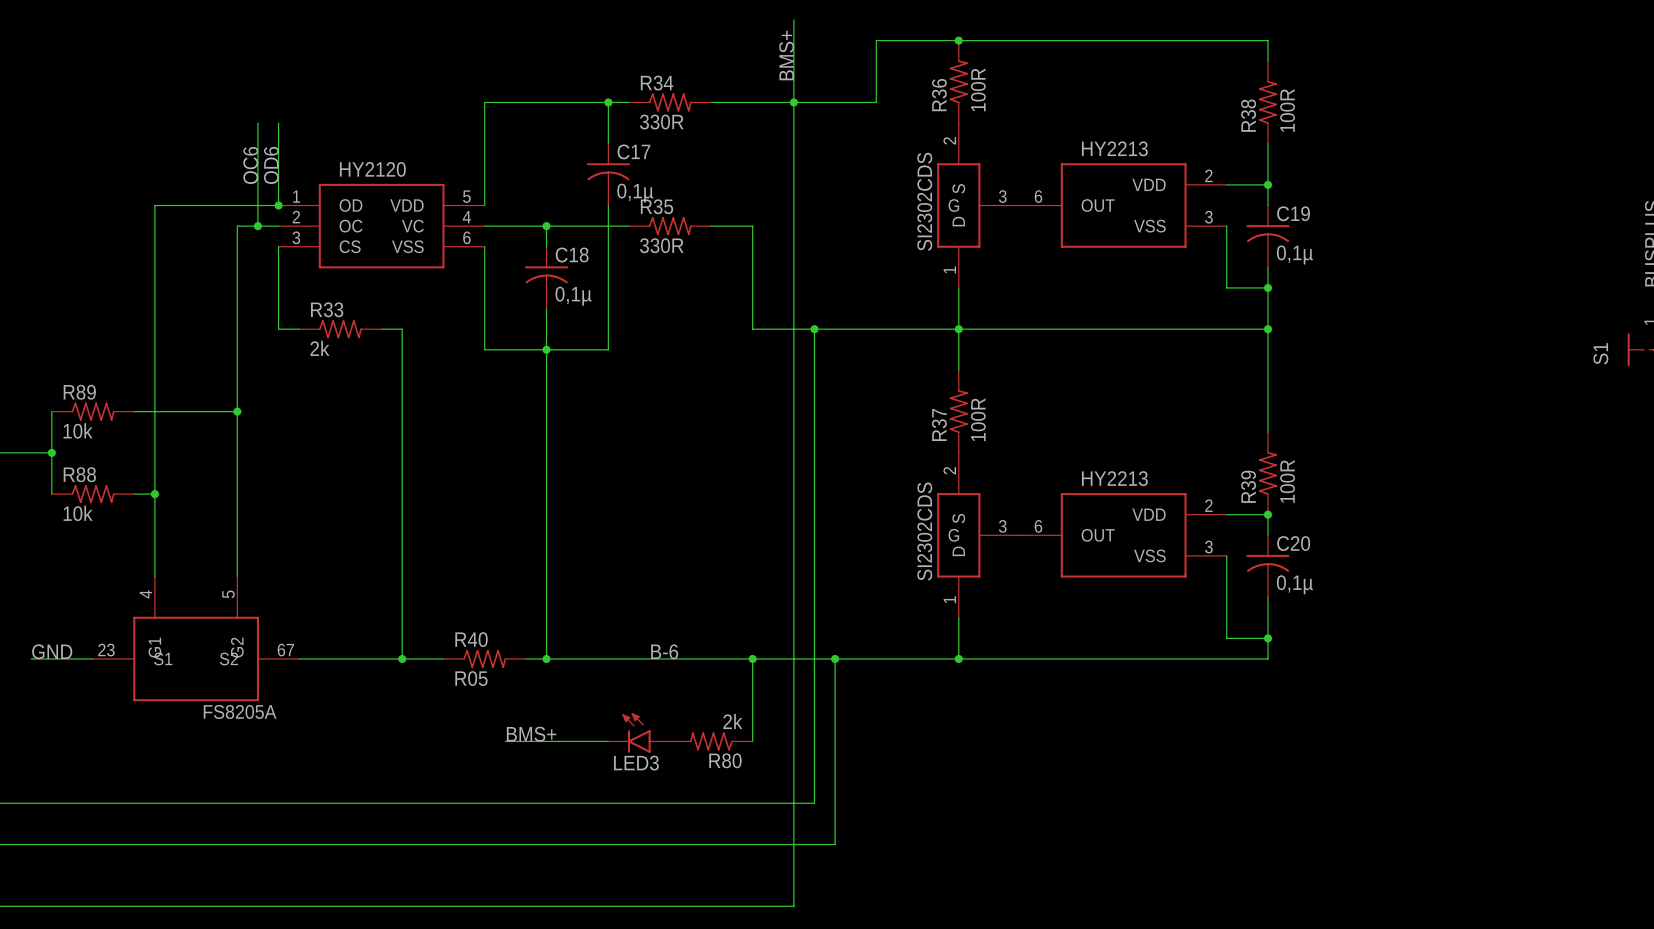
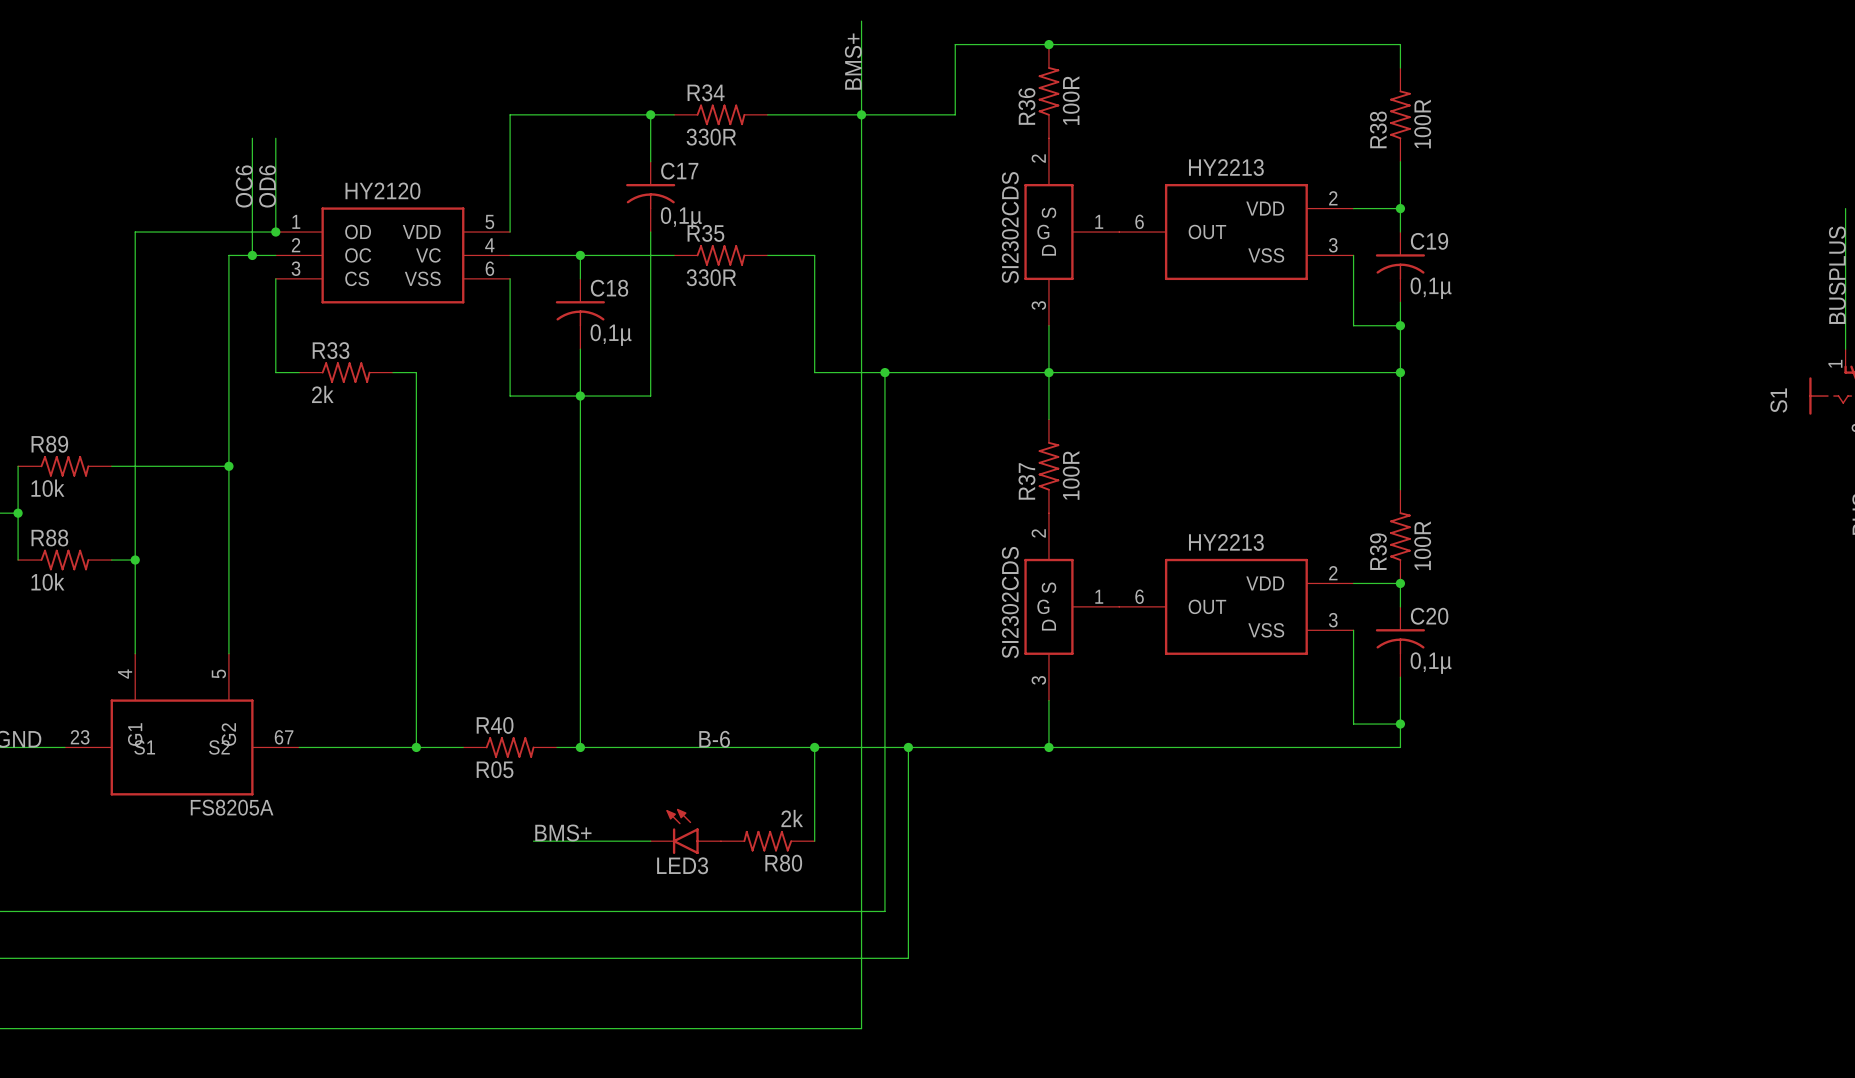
part pin number: 3 (1002, 196) -> 1 (1099, 221)
part pin number: 1 (949, 269) -> 3 (1038, 305)
part pin number: 3 (1002, 526) -> 1 (1099, 596)
part pin number: 1 (949, 599) -> 3 (1038, 680)

